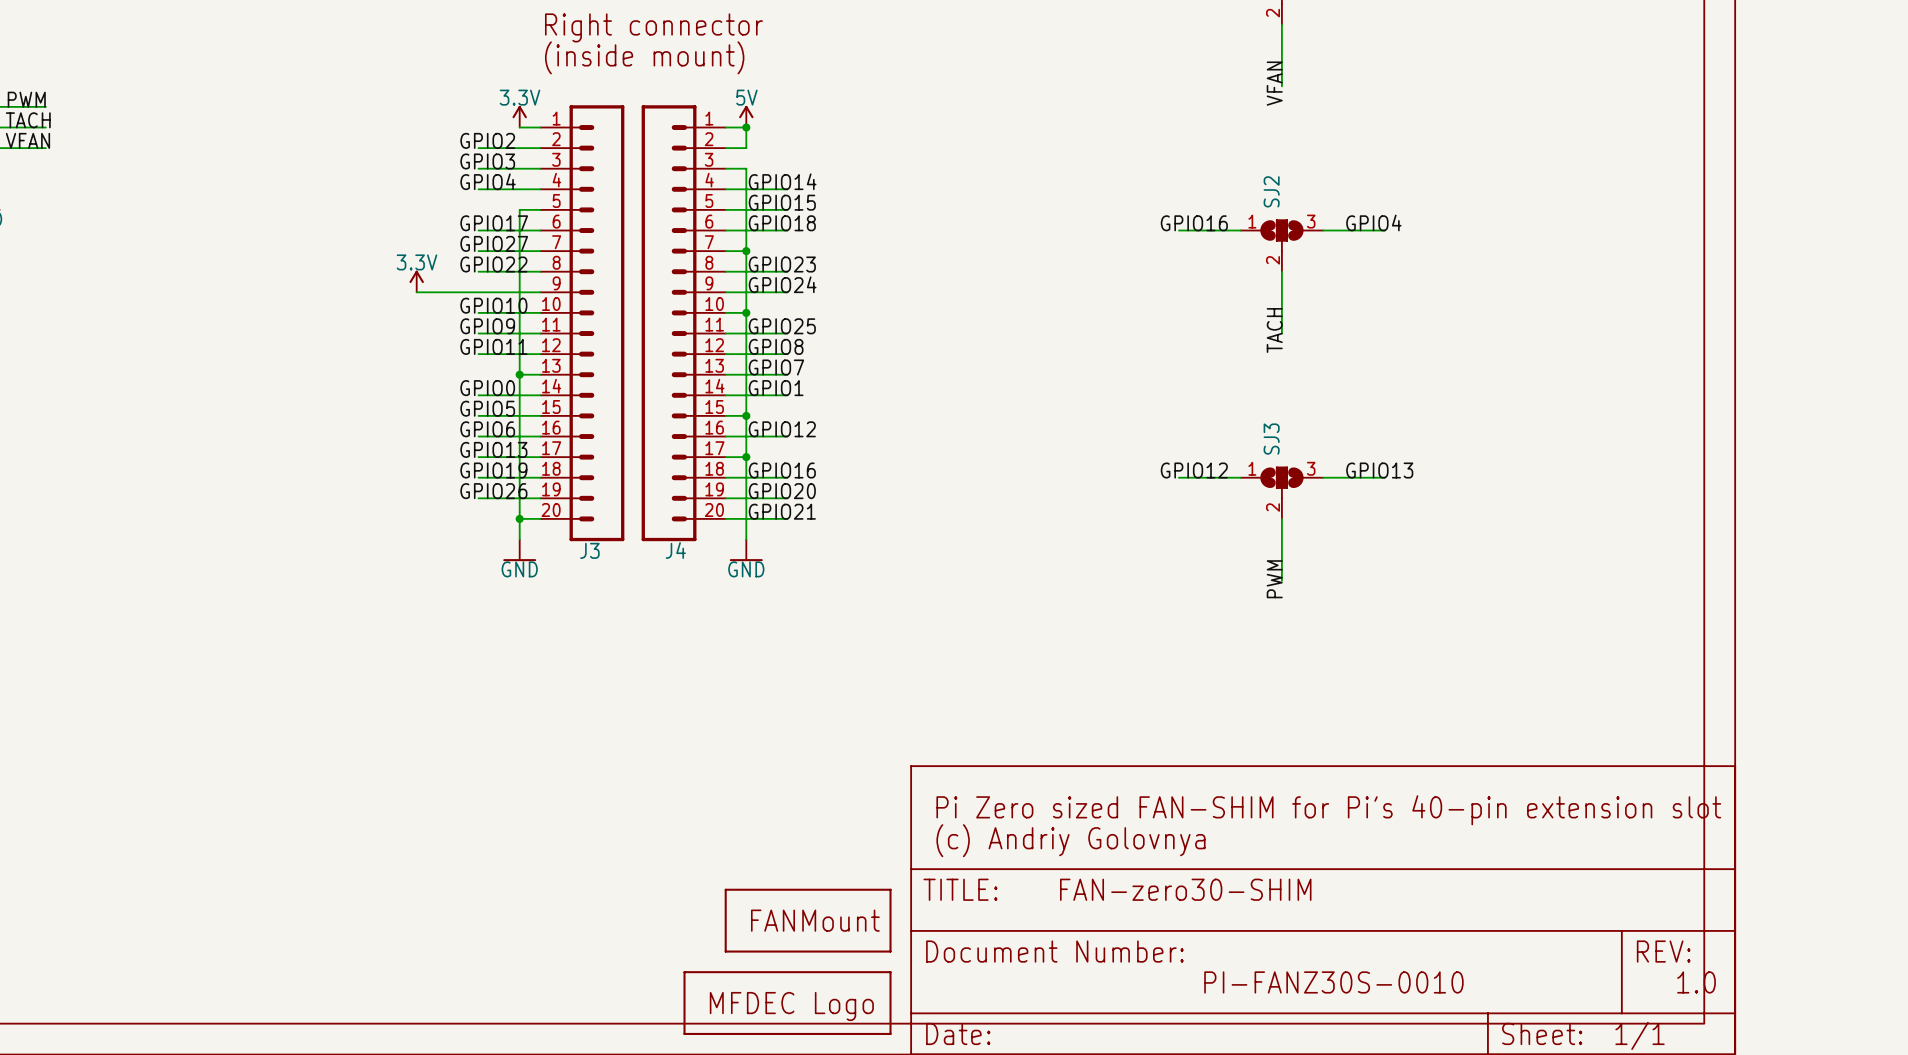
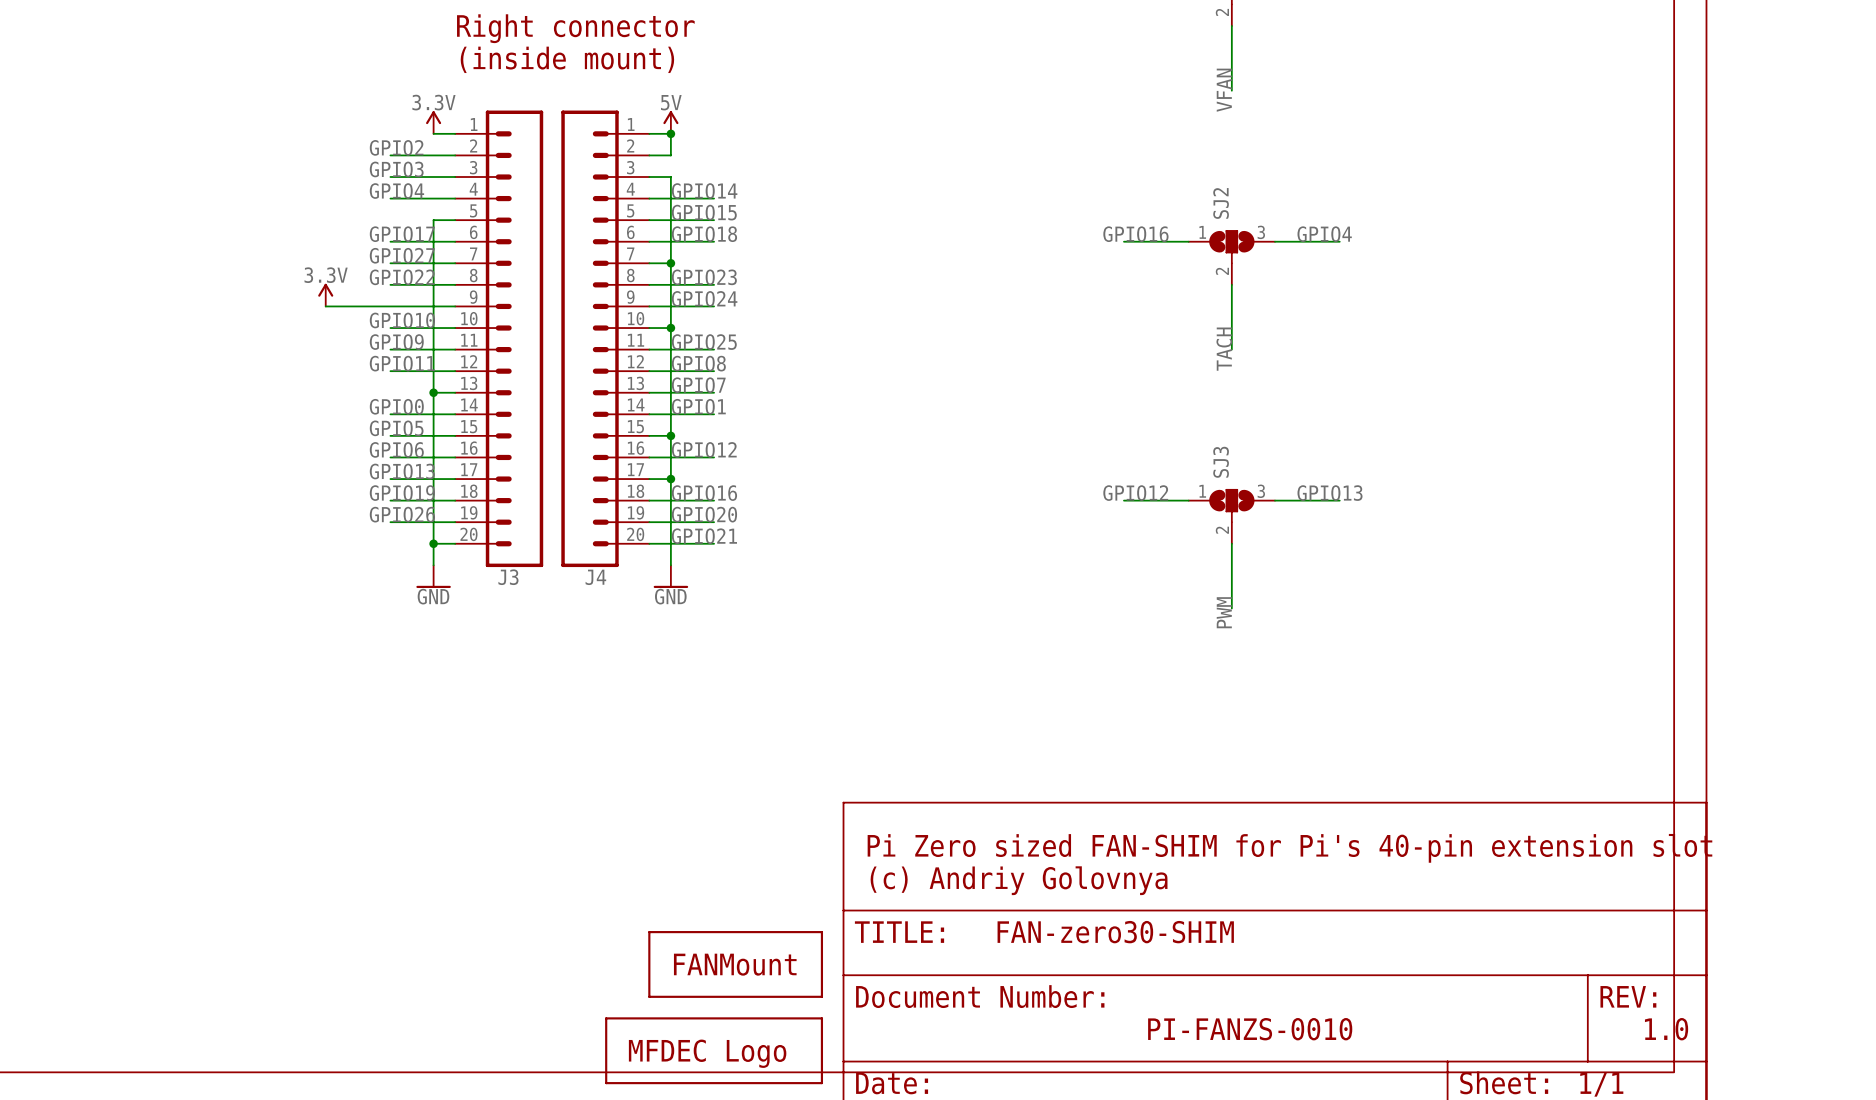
text: PI-FANZ30S-0010 (1333, 982) -> PI-FANZS-0010 (1250, 1029)

